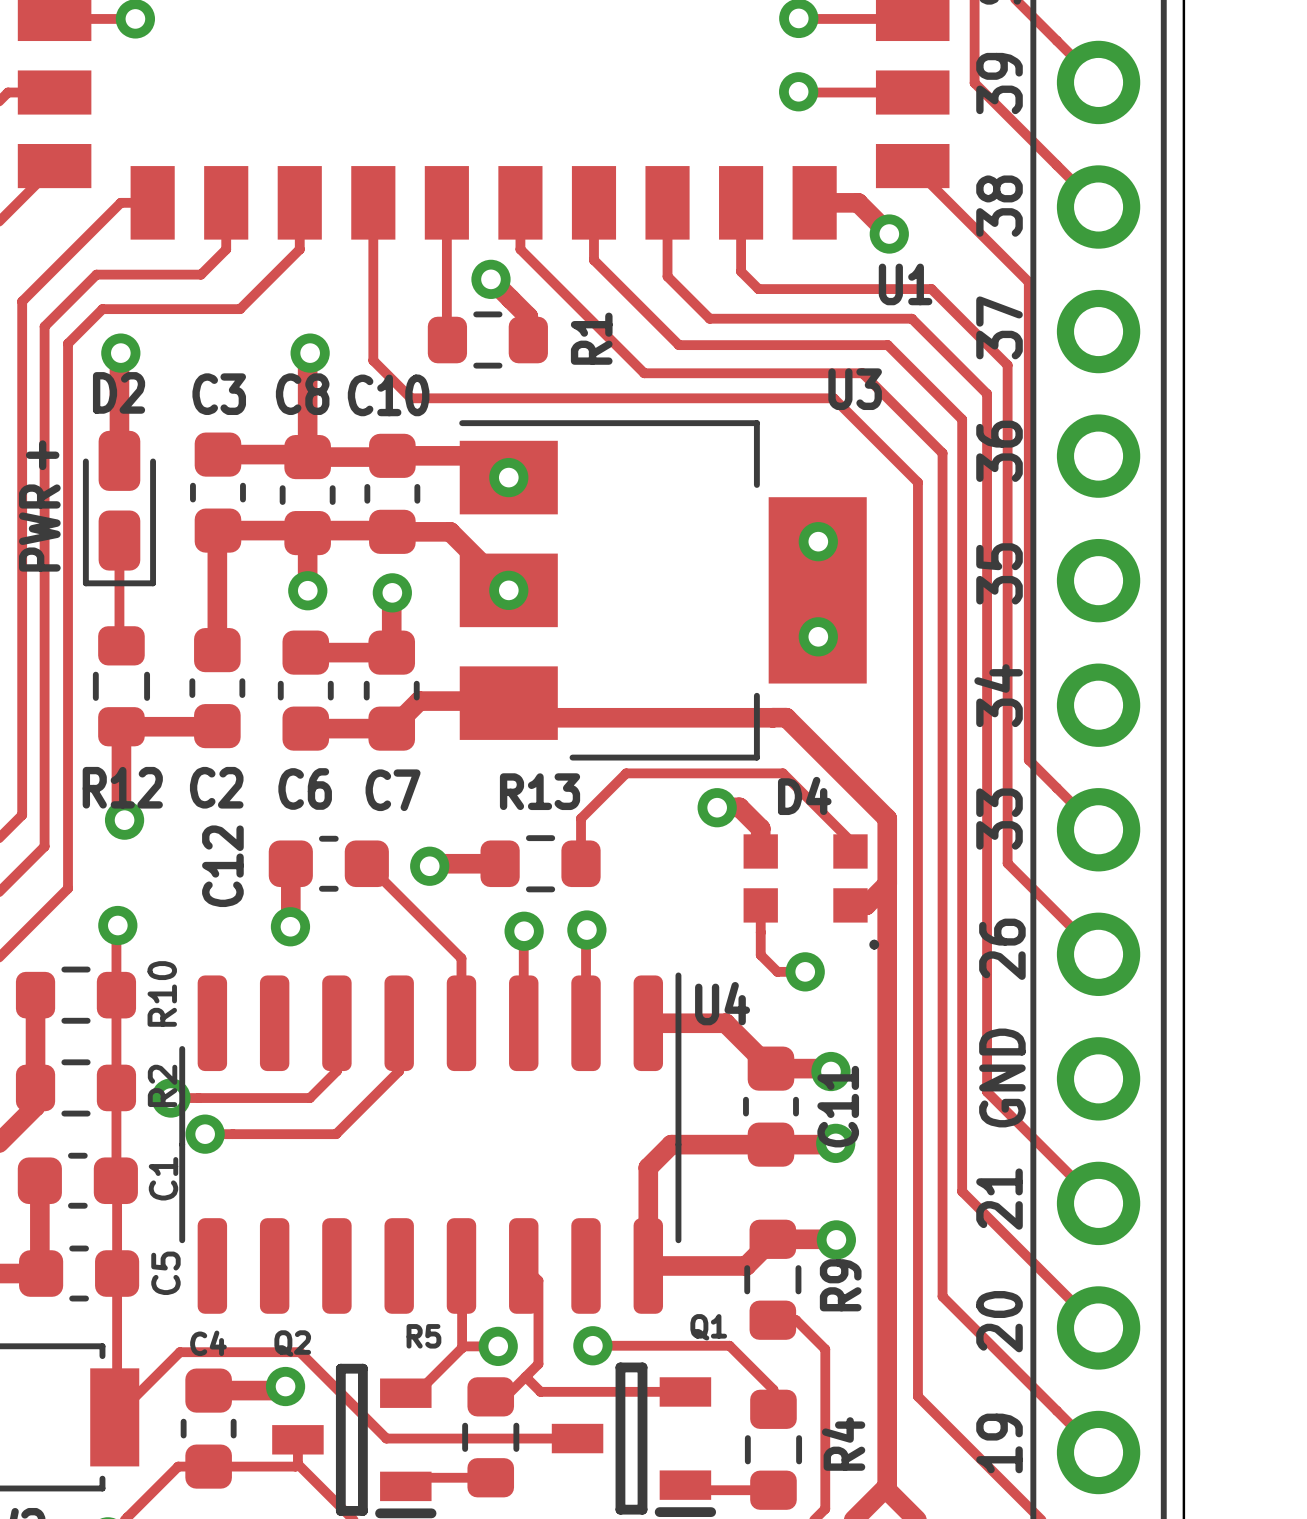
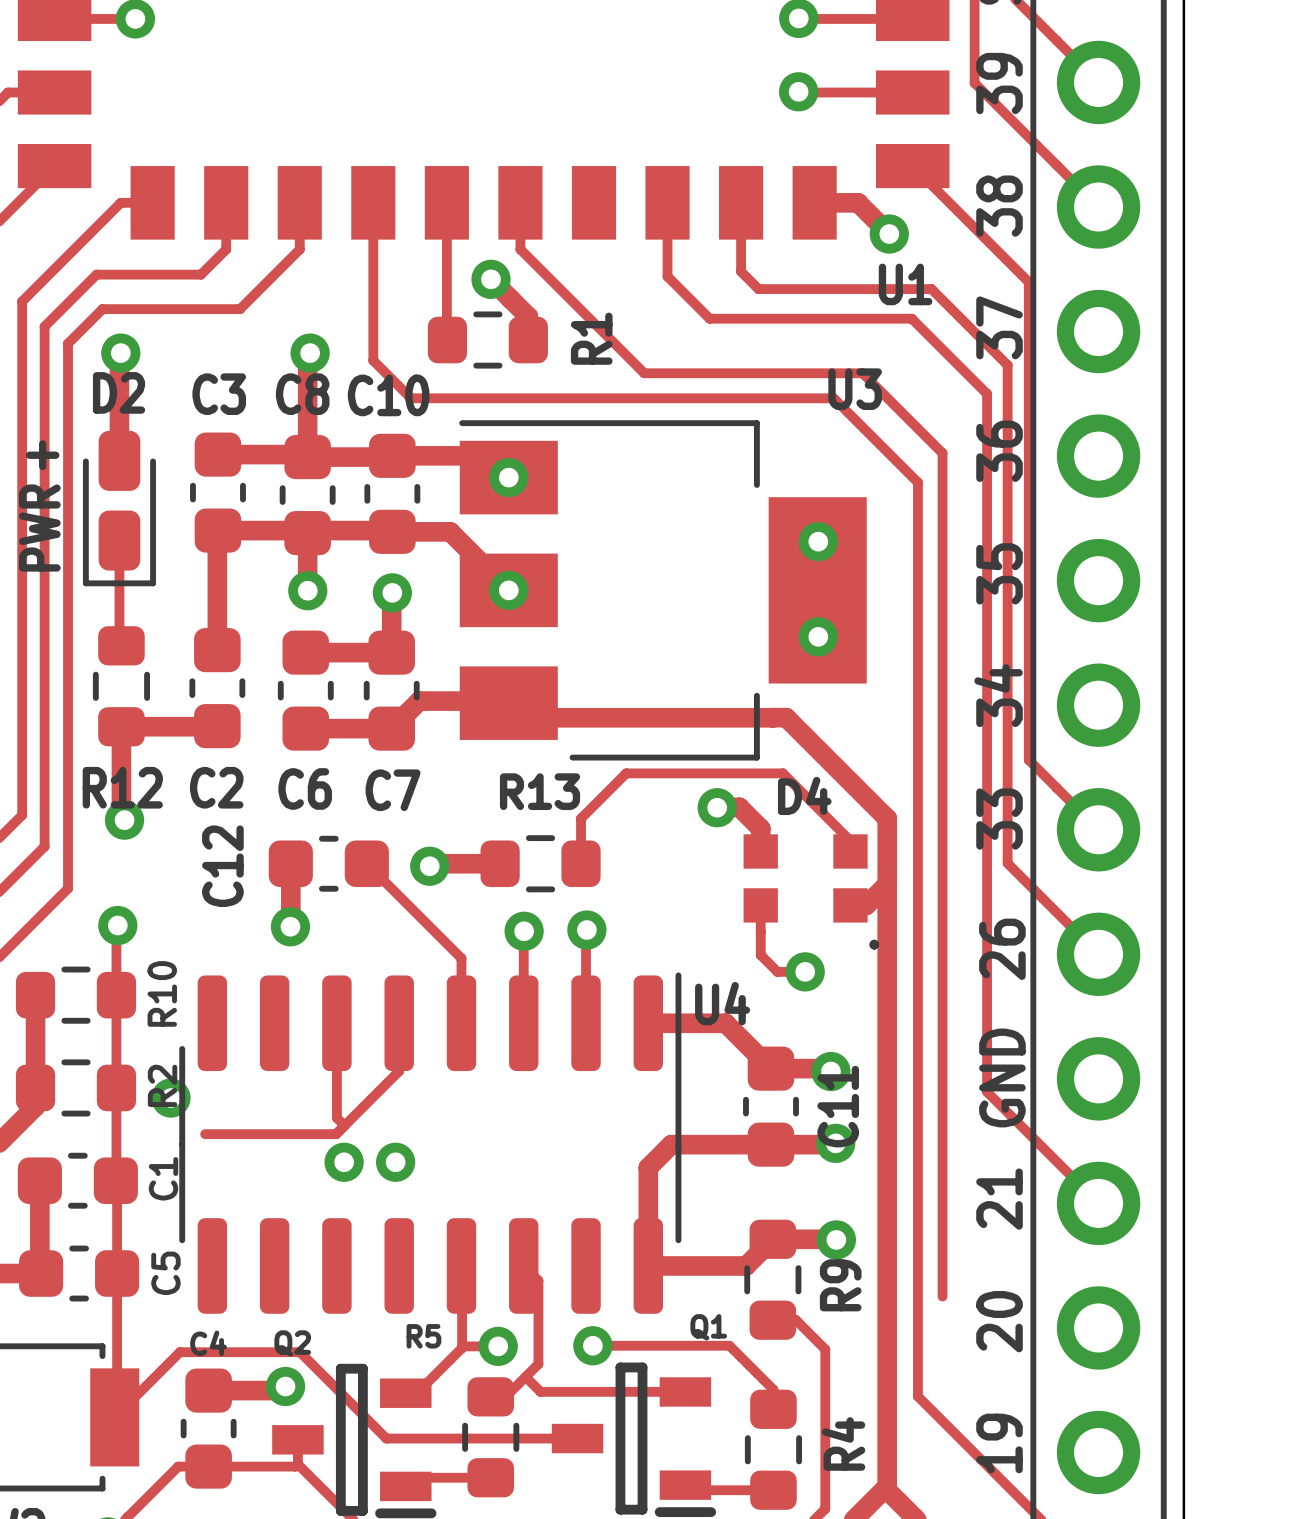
track: (593, 202) (593, 260) (678, 345) (887, 345) (962, 419) (962, 1191) (1098, 1327) -> none
track: (336, 1071) (309, 1098) (170, 1098) -> (336, 1071) (336, 1118) (344, 1125)
via: (205, 1134) -> none
via: none -> (344, 1162)
via: none -> (395, 1162)
track: (942, 1296) (1098, 1452) -> none

